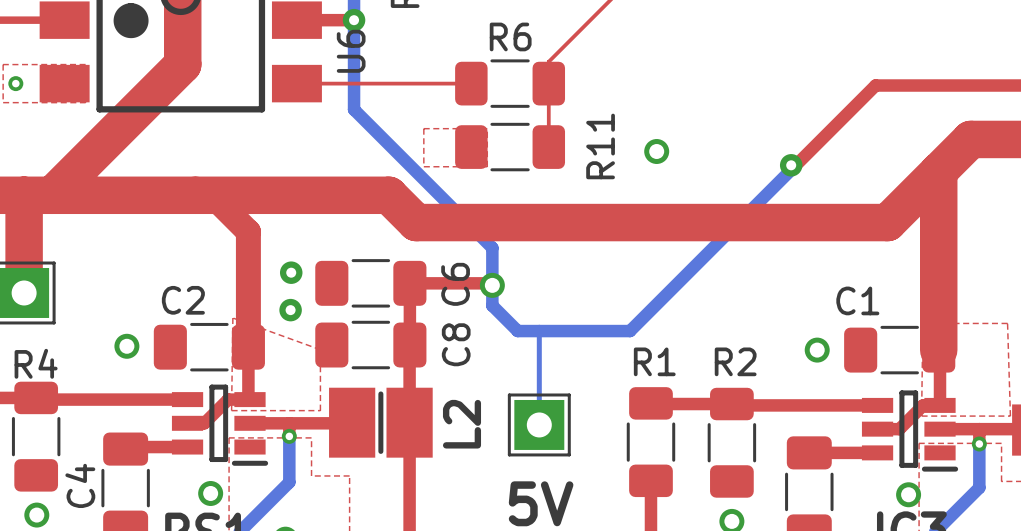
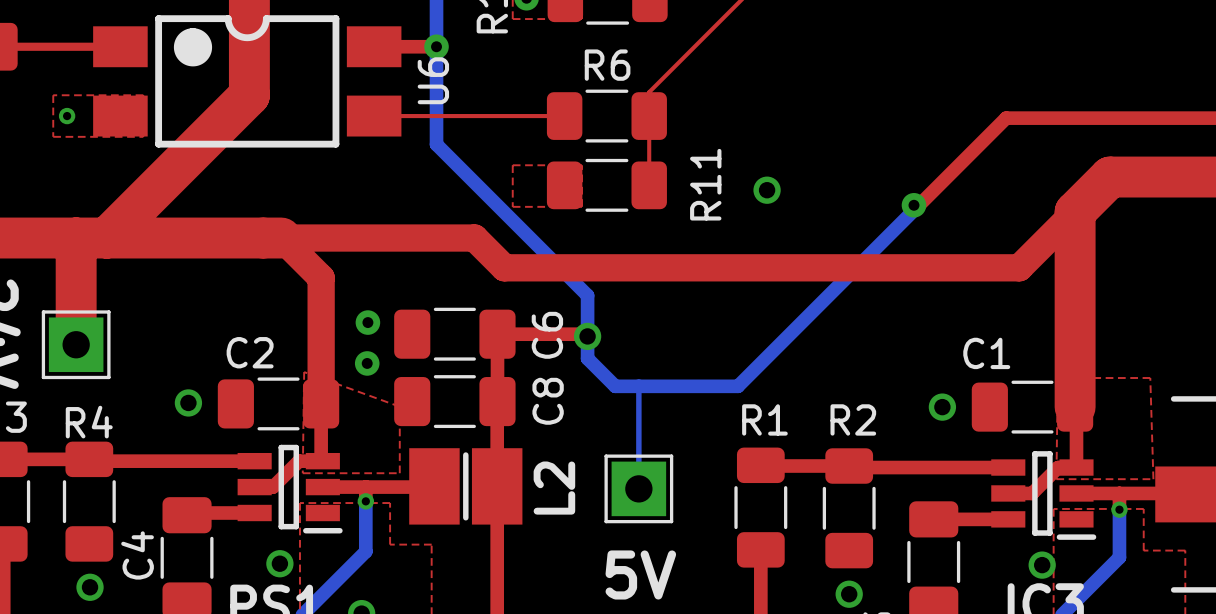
top track width: thick (938, 171) (887, 222) (416, 222) (388, 195) (211, 195) -> thin (1075, 212) (1019, 267) (504, 267) (474, 238) (281, 238)

